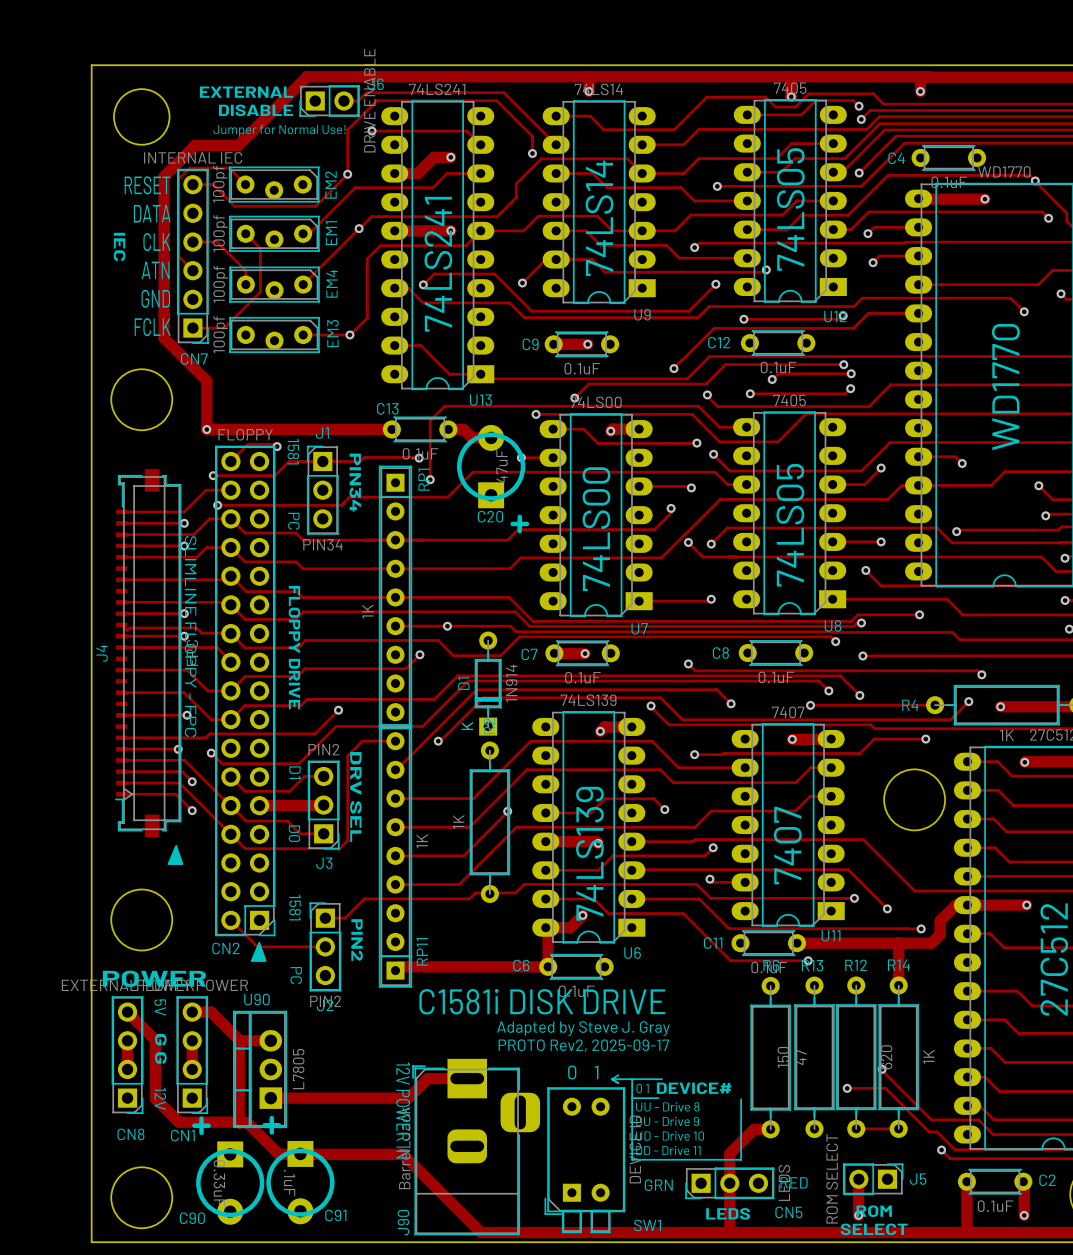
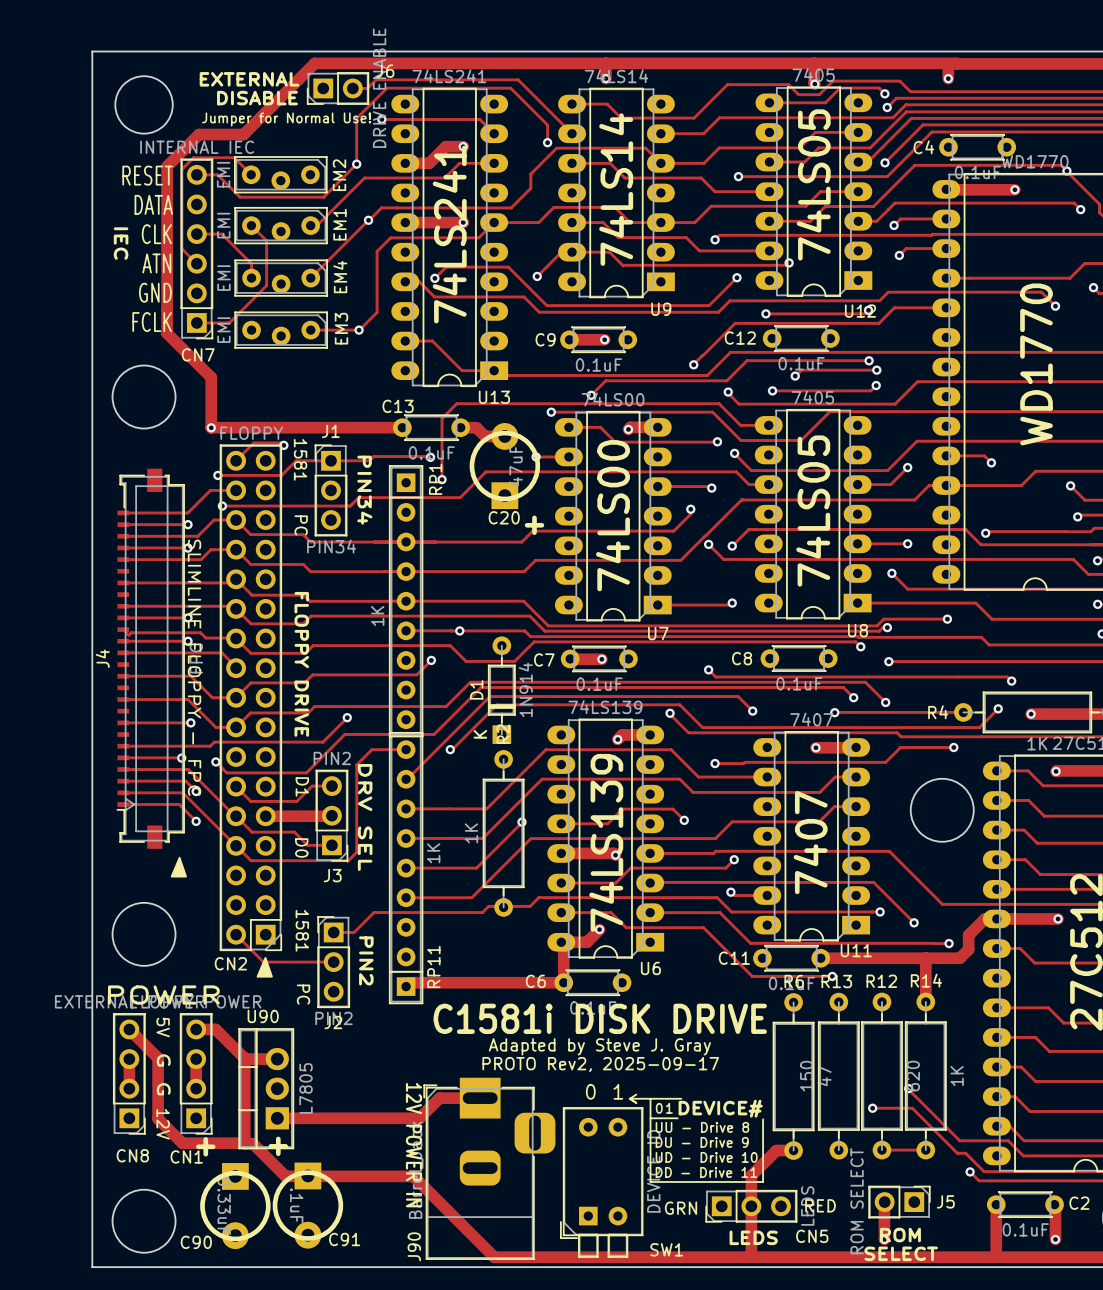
EM2 value: 100pf (220, 184) -> EMI (223, 174)
EM1 value: 100pf (220, 233) -> EMI (223, 225)
EM4 value: 100pf (220, 284) -> EMI (223, 278)
EM3 value: 100pf (220, 334) -> EMI (223, 330)

